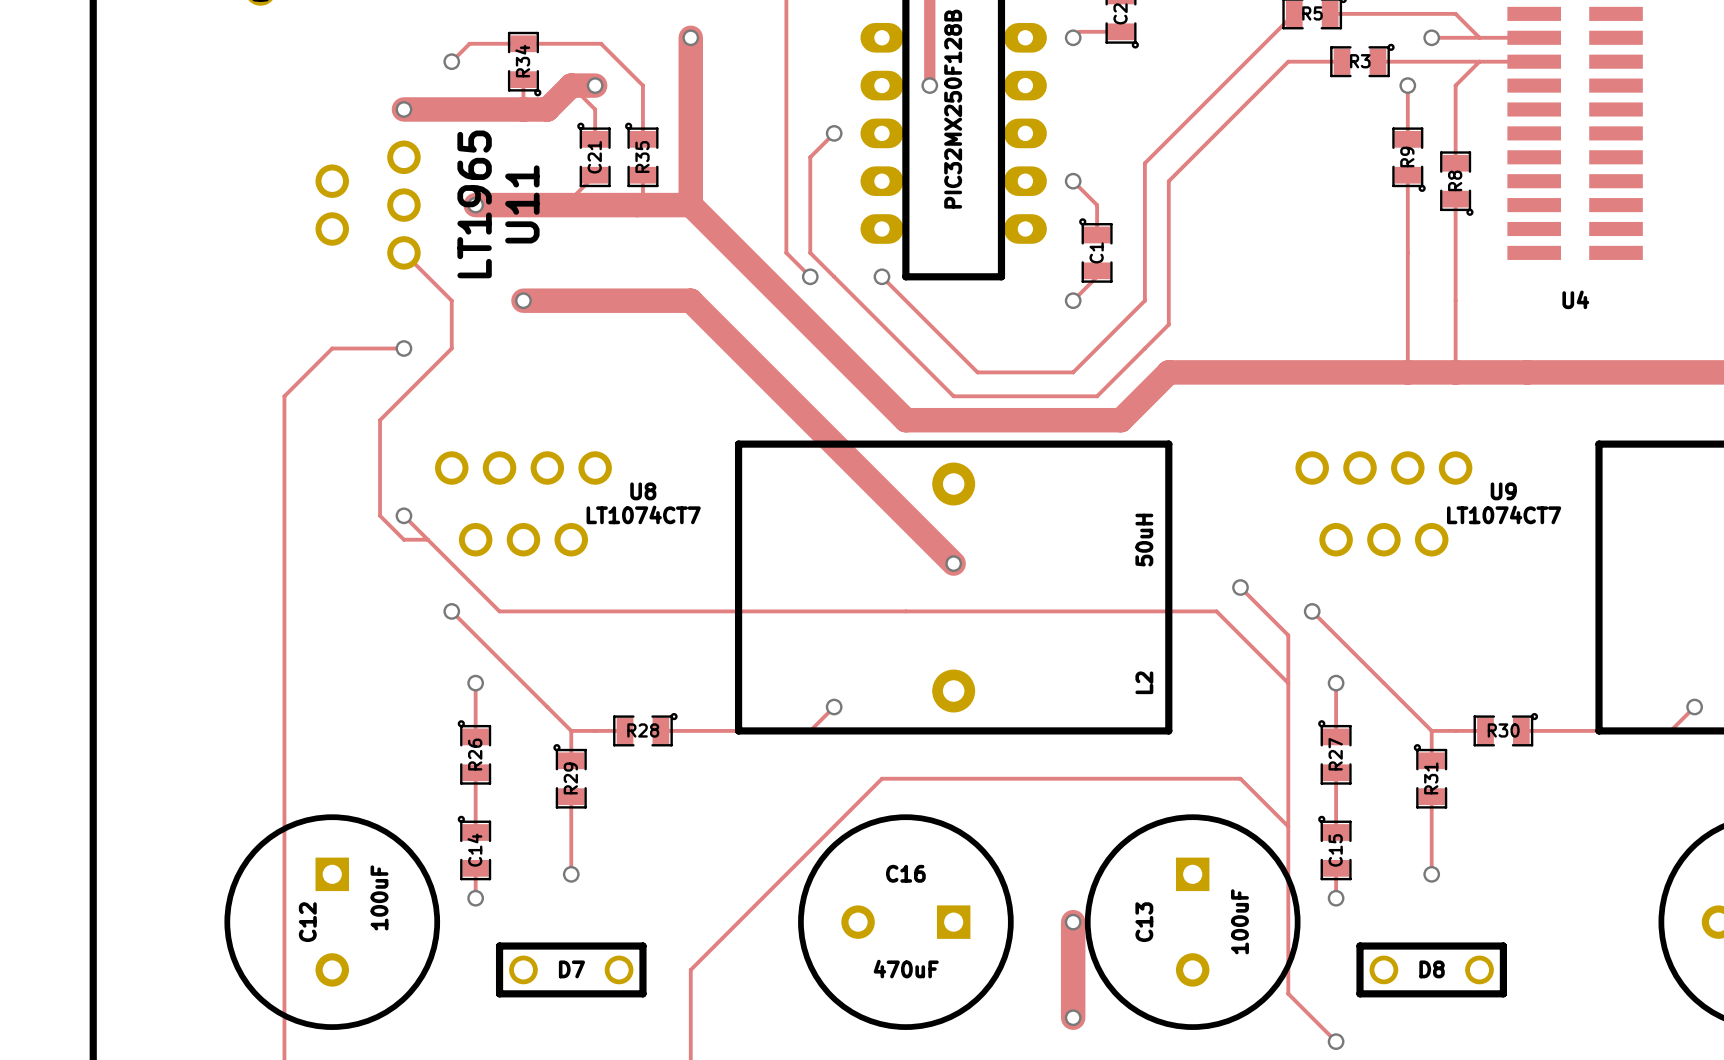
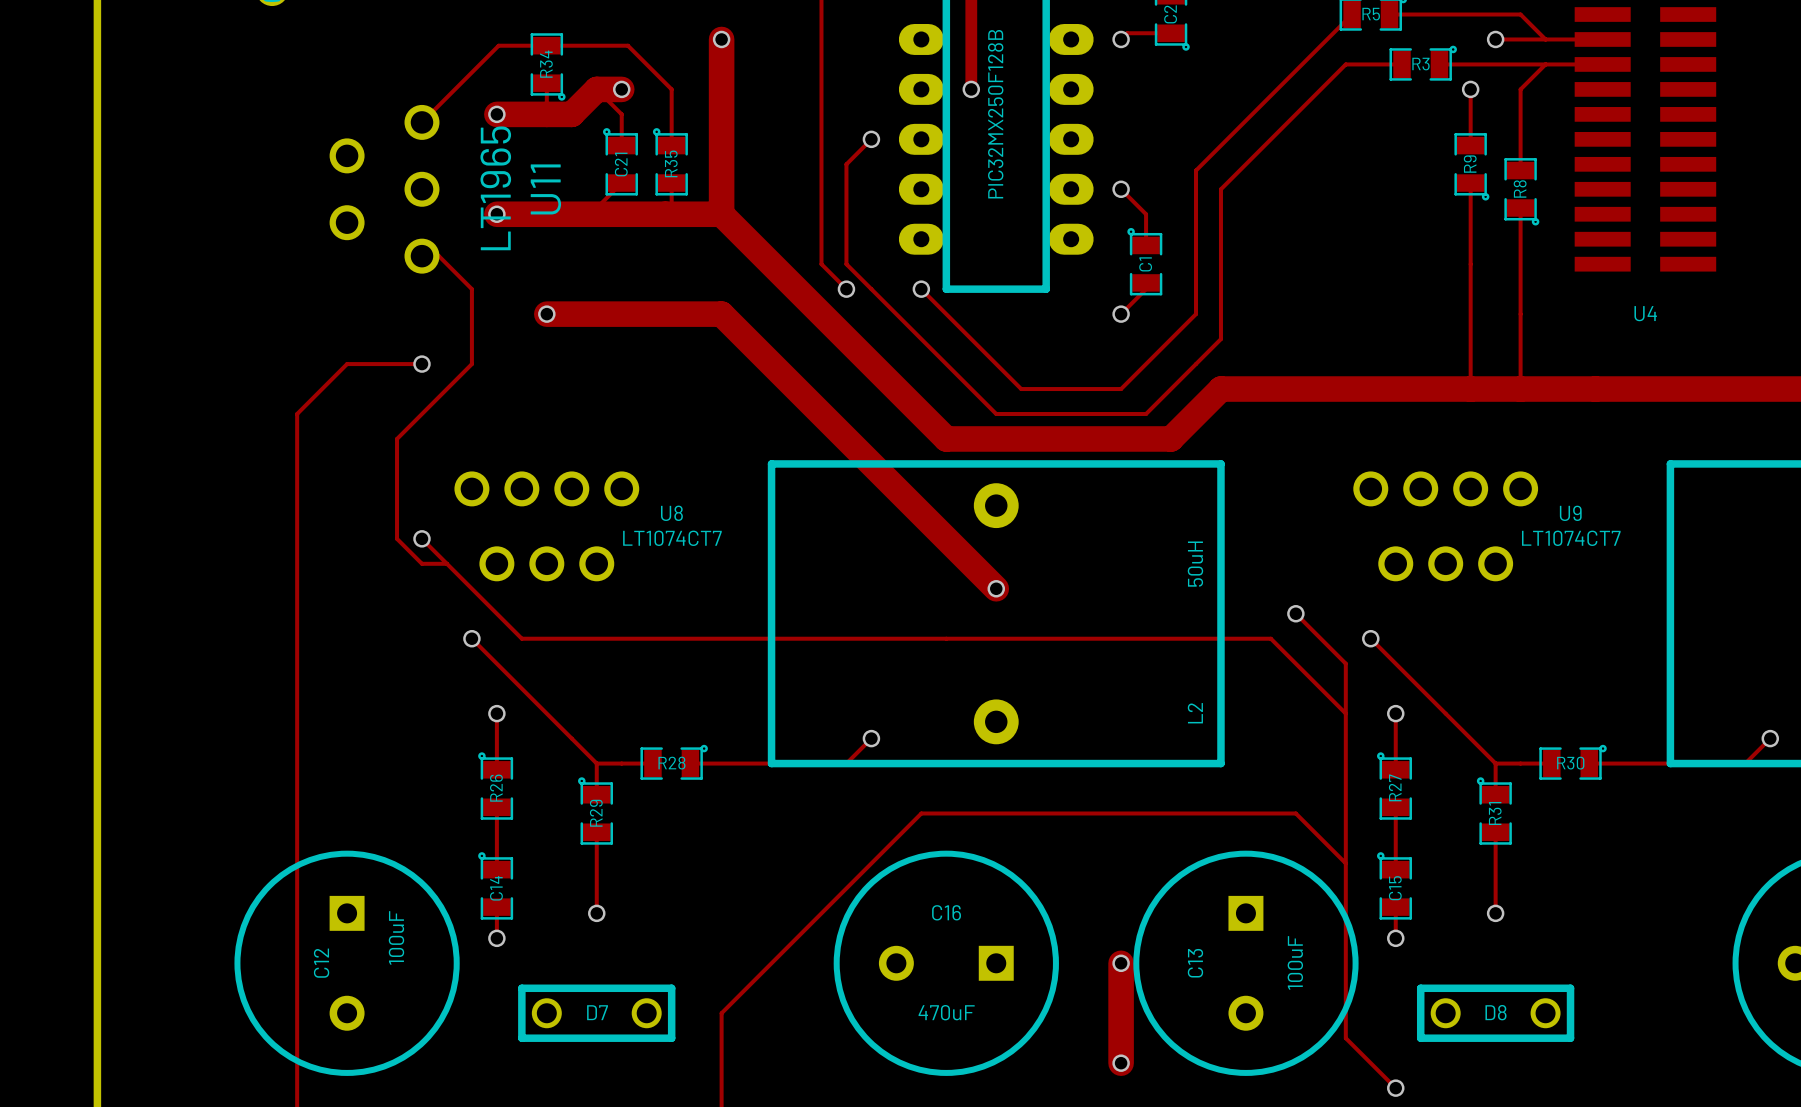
track: (477, 43) (469, 43) (451, 61) -> (498, 45) (421, 122)
via: (451, 61) -> none
track: (403, 109) (475, 109) -> none
via: (403, 109) -> none
via: none -> (496, 114)
U11 footprint: [315, 140, 421, 270] -> [329, 104, 440, 274]
track: (403, 252) (451, 300) -> (421, 256) (438, 256) (471, 289) (471, 314)

